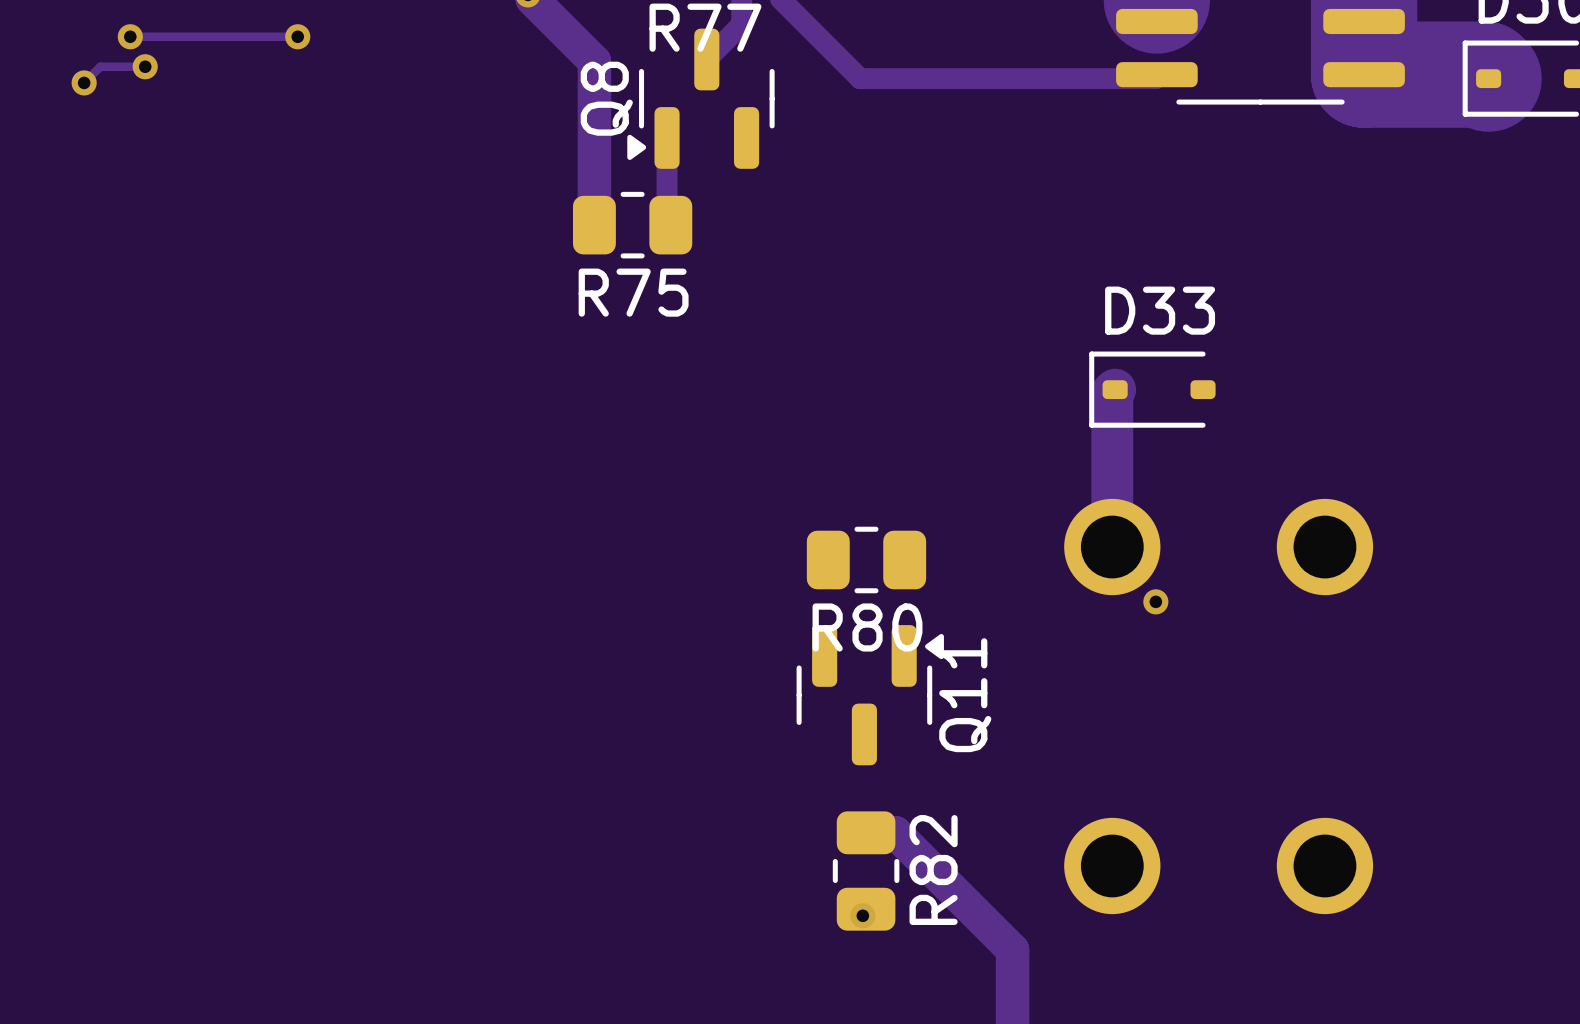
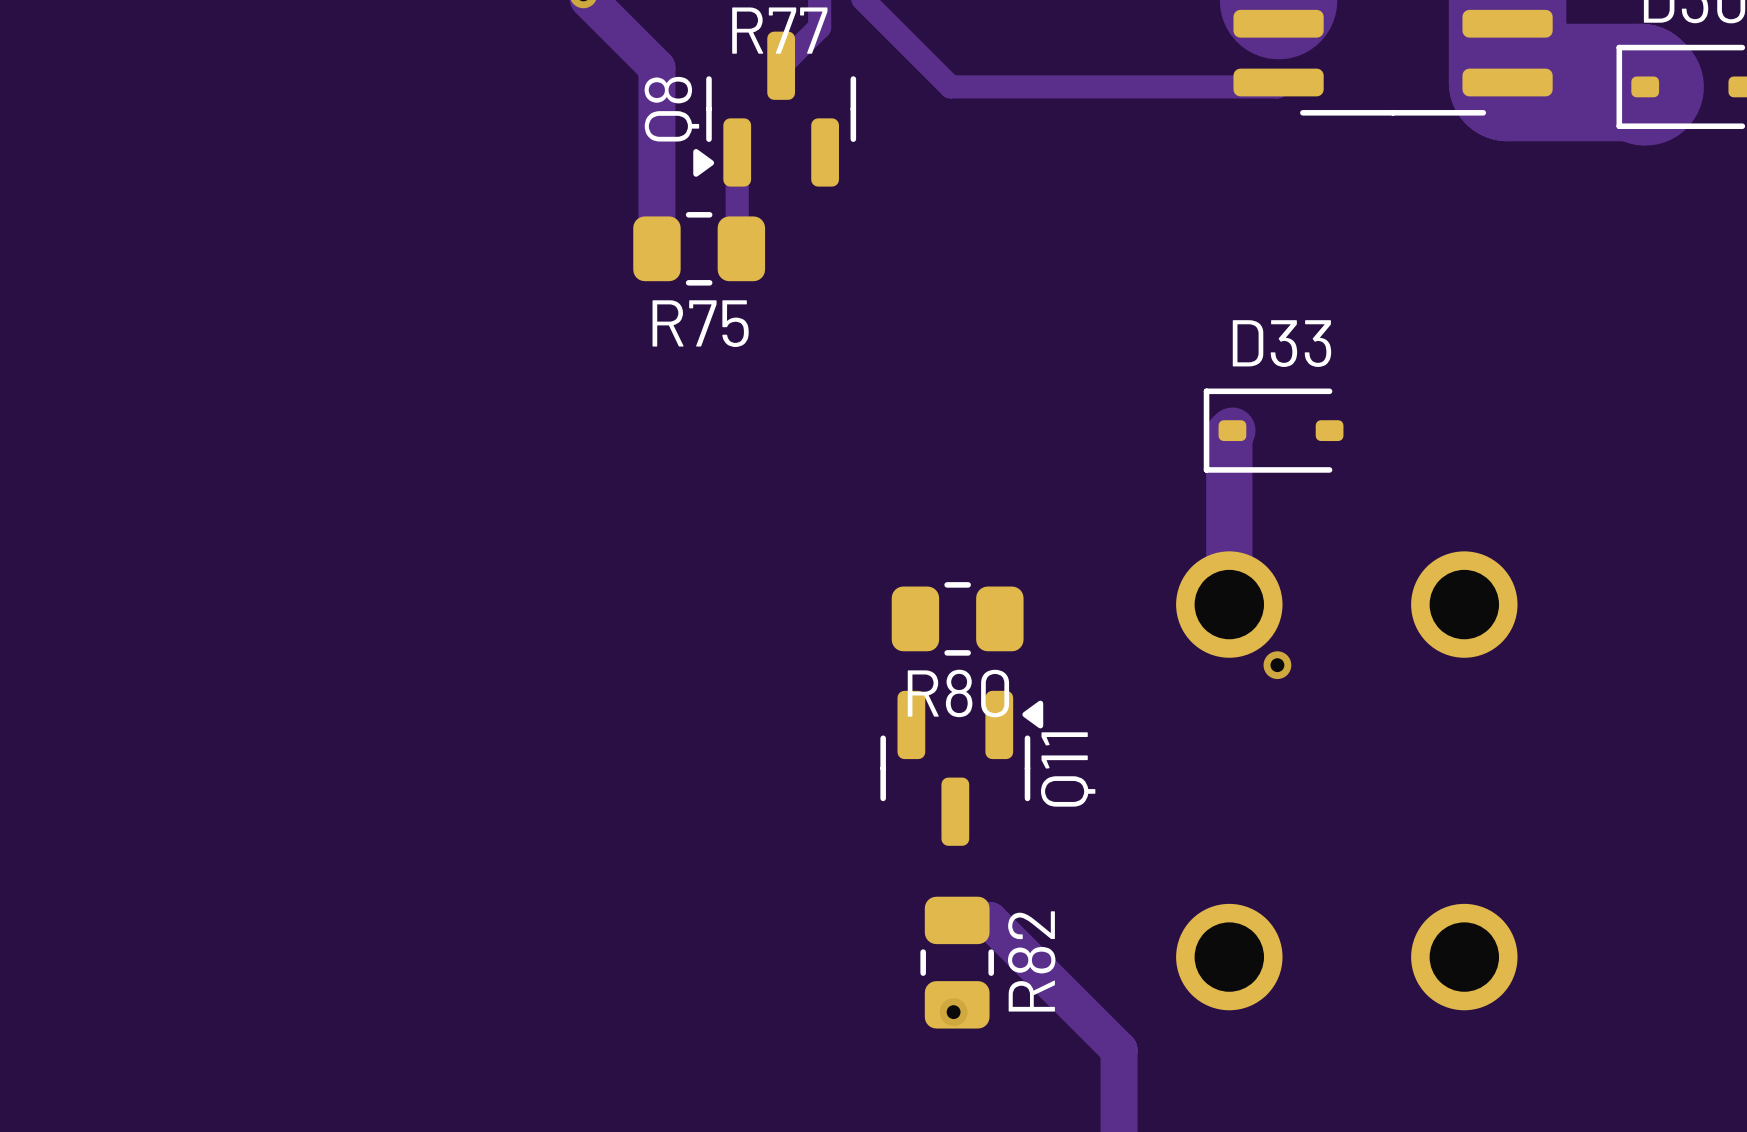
track: (130, 36) (297, 36) -> none
via: (130, 36) -> none
via: (297, 36) -> none
track: (145, 66) (100, 66) (84, 82) -> none
via: (145, 66) -> none
via: (84, 82) -> none

